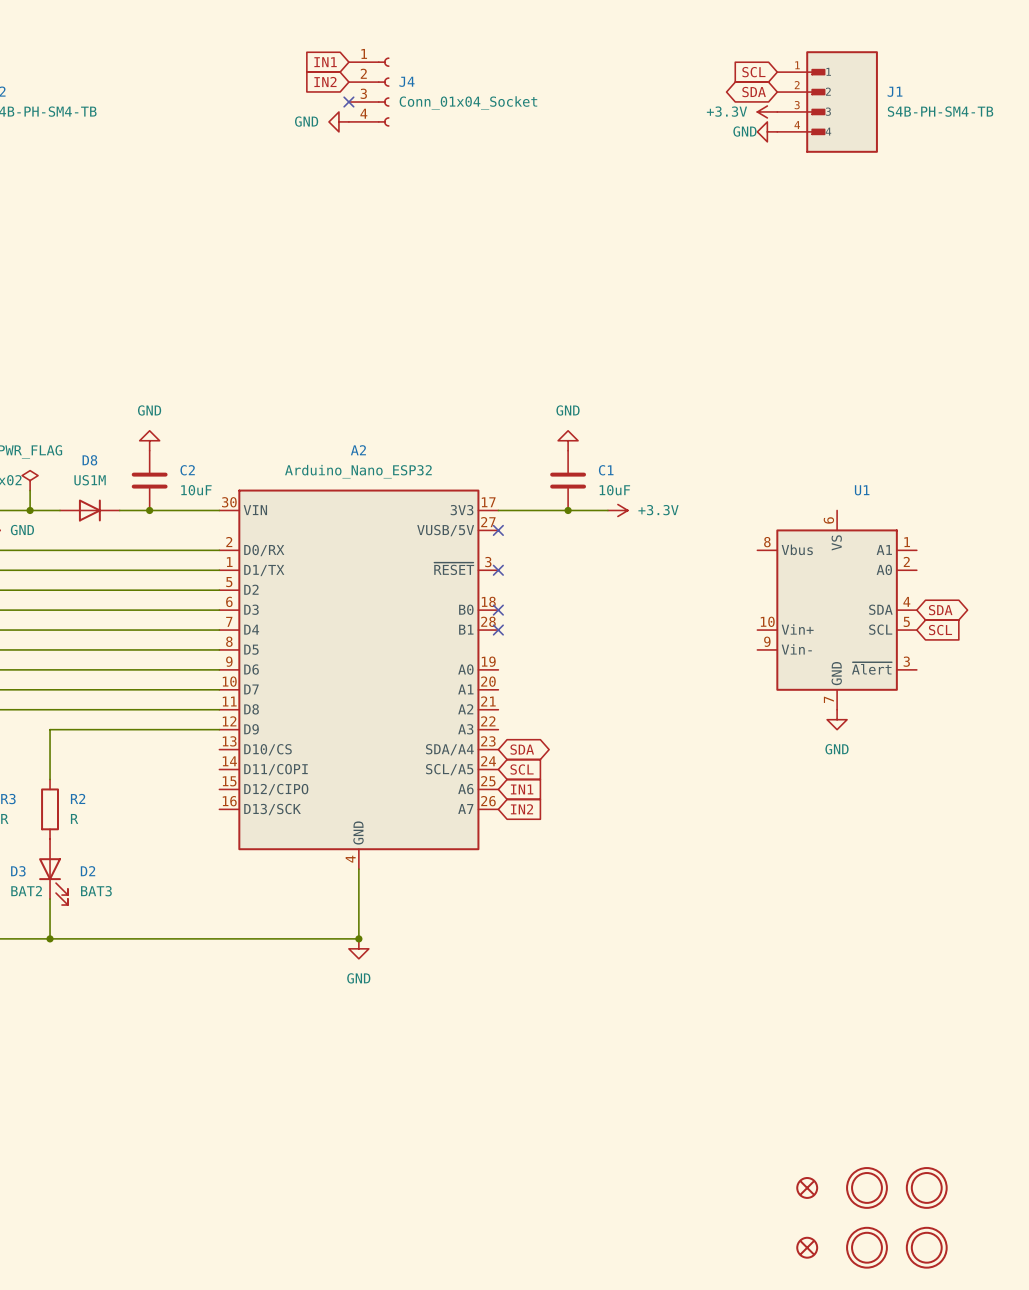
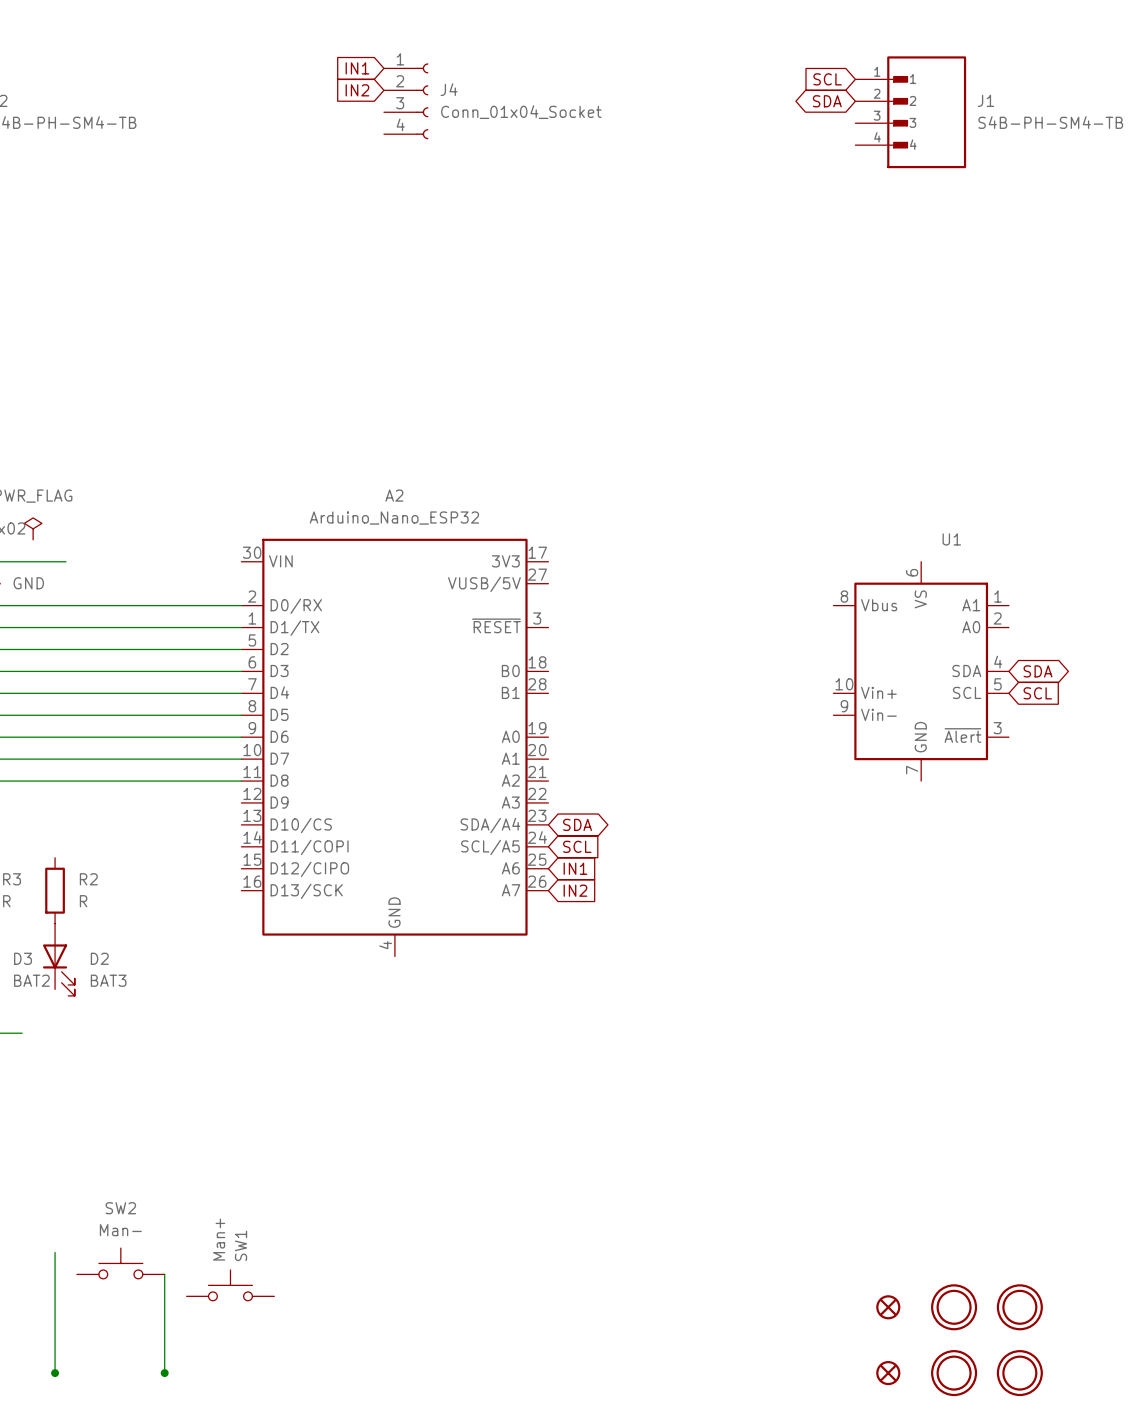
no-connect mark: (348, 102) -> none
power symbol: +3.3V (767, 111) -> none
power symbol: GND (338, 121) -> none
power symbol: GND (767, 131) -> none
power symbol: GND (149, 440) -> none
power symbol: GND (568, 440) -> none
C2: 10uF (149, 480) -> none
C1: 10uF (568, 480) -> none
wire: (30, 490) (30, 510) -> none
junction: (30, 510) -> none
D8: US1M (89, 510) -> none
wire: (119, 510) (219, 510) -> none
junction: (149, 510) -> none
wire: (498, 510) (607, 510) -> none
junction: (568, 510) -> none
power symbol: +3.3V (617, 510) -> none
no-connect mark: (498, 530) -> none
no-connect mark: (498, 570) -> none
no-connect mark: (498, 610) -> none
no-connect mark: (498, 630) -> none
power symbol: GND (837, 719) -> none
wire: (219, 729) (50, 729) (50, 779) -> none
wire: (358, 869) (358, 938) (20, 938) -> none
wire: (50, 899) (50, 938) -> none
junction: (50, 938) -> none
junction: (358, 938) -> none
power symbol: GND (358, 948) -> none
wire: none -> (55, 1252) (55, 1373)
SW2: none -> Man- (120, 1263)
wire: none -> (164, 1274) (164, 1373)
SW1: none -> Man+ (230, 1285)
junction: none -> (55, 1373)
junction: none -> (164, 1373)

